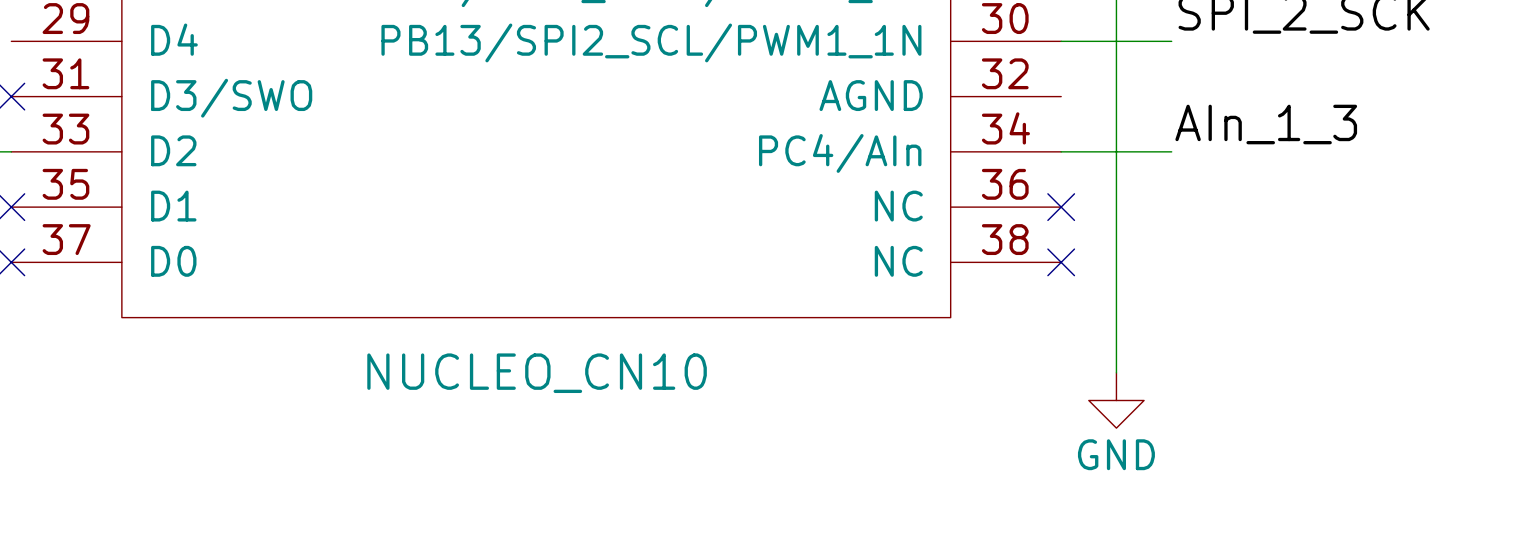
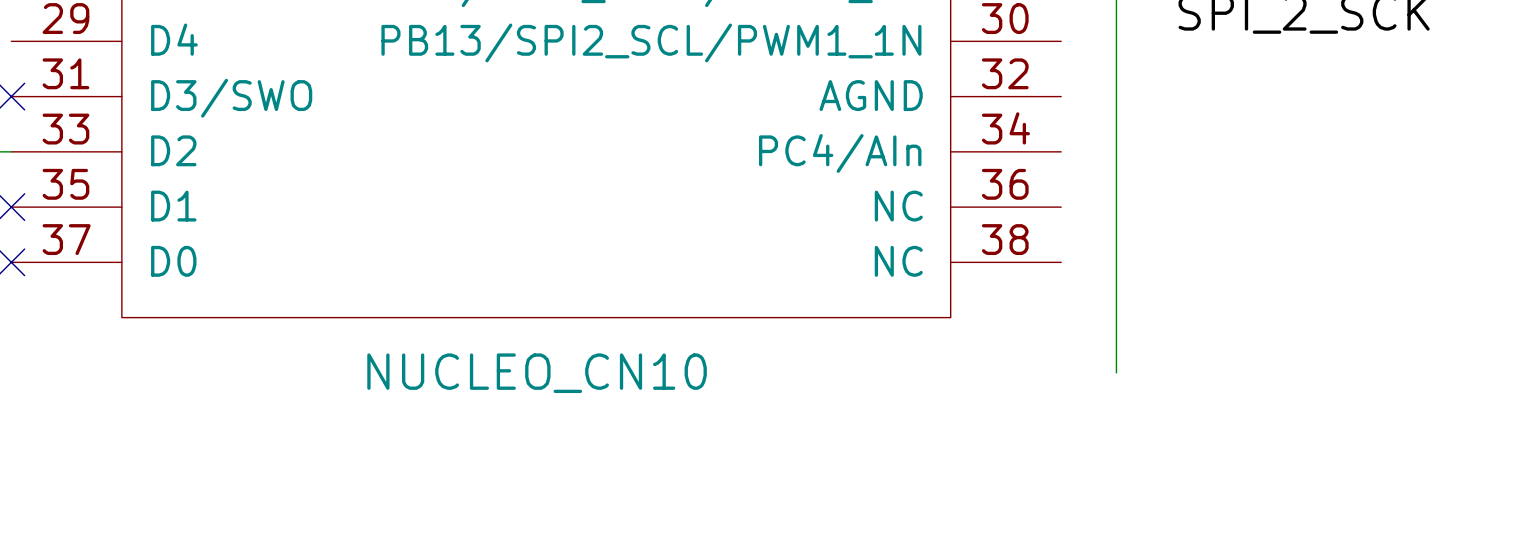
wire: (1061, 41) (1171, 41) -> none
label: AIn_1_3 (1266, 124) -> none
wire: (1061, 151) (1171, 151) -> none
no-connect mark: (1061, 207) -> none
no-connect mark: (1061, 262) -> none
power symbol: GND (1116, 400) -> none

